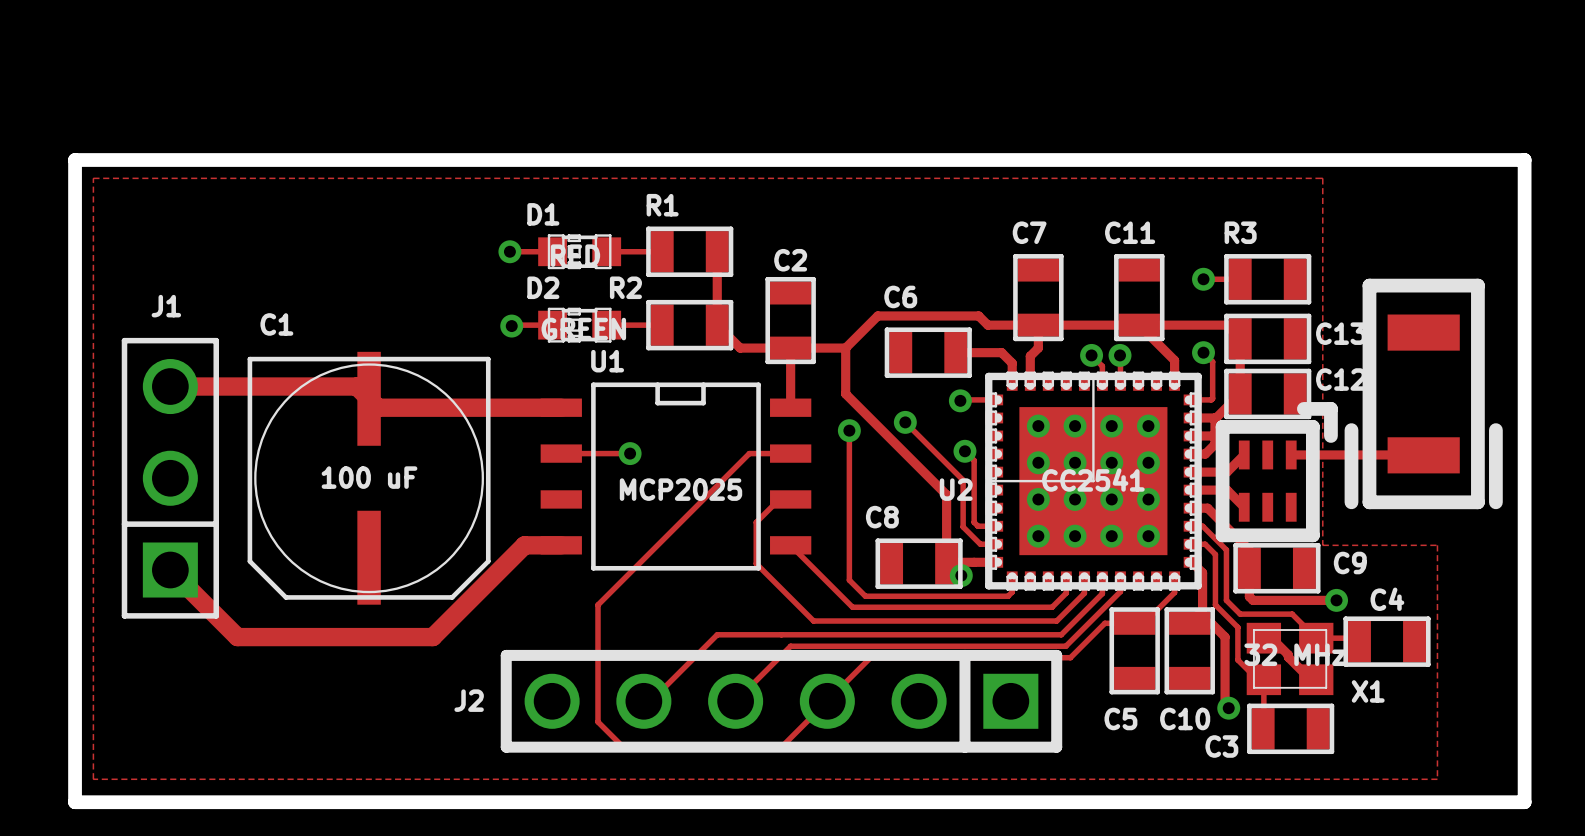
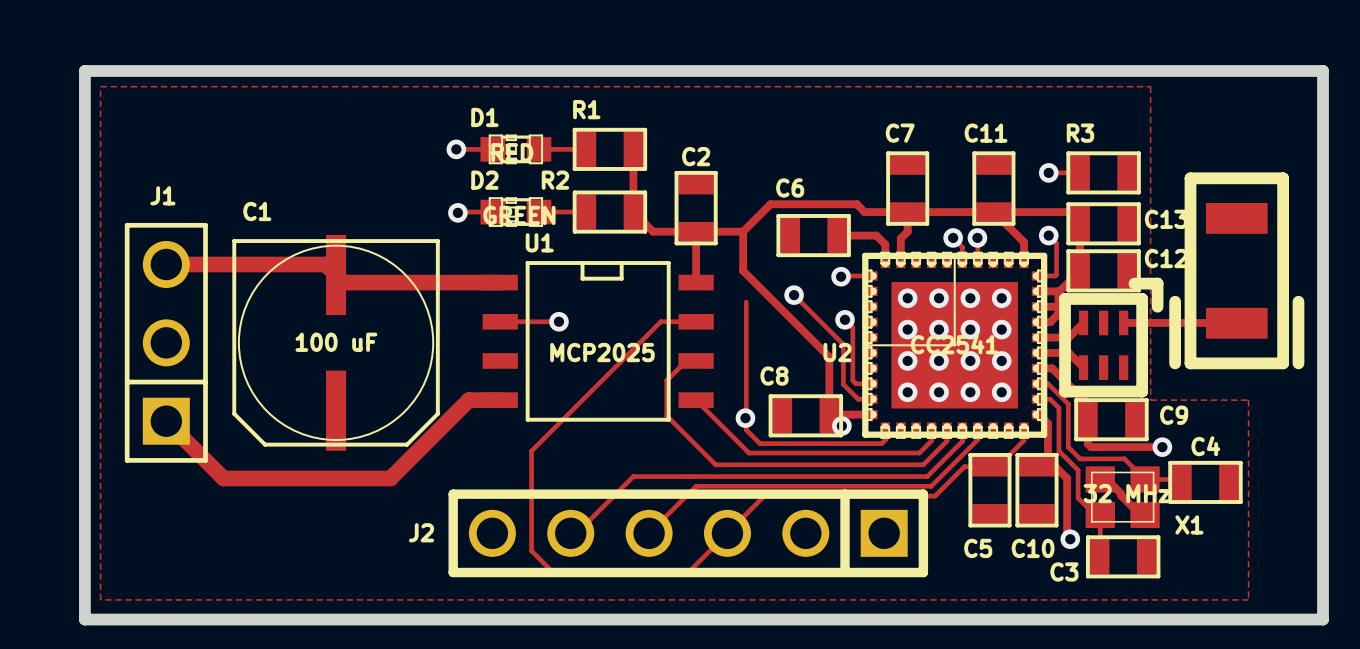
via position: (849, 430) -> (745, 418)

